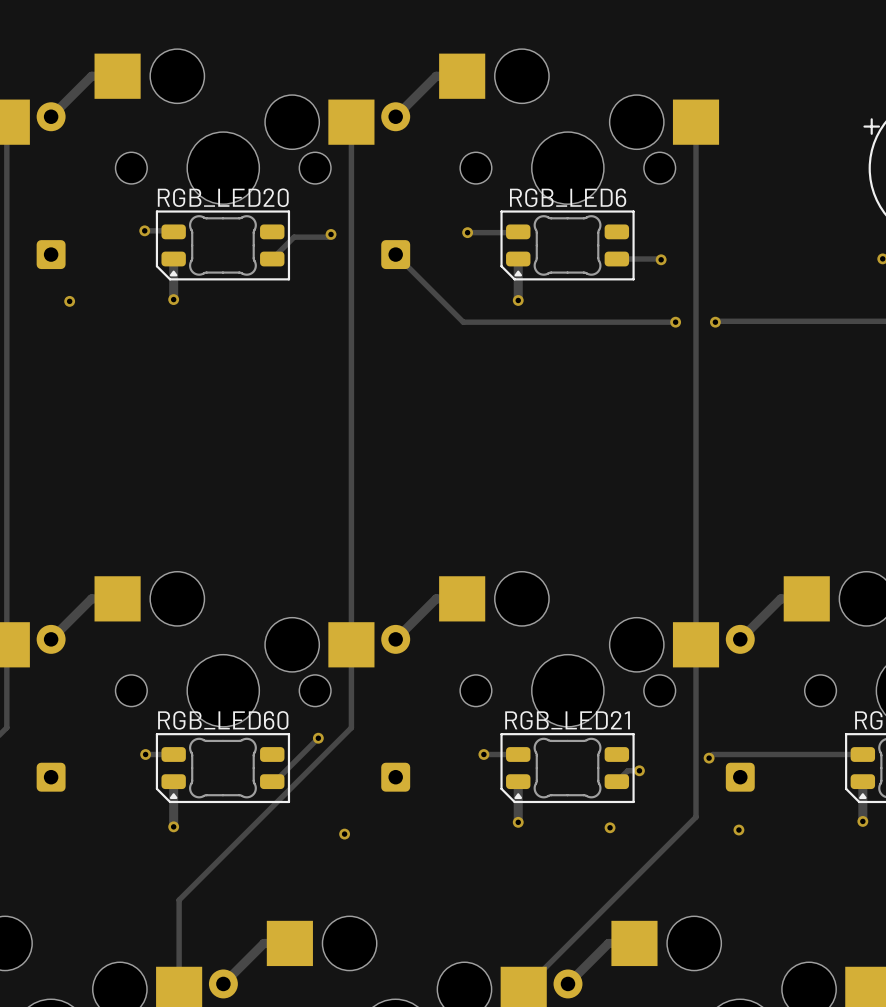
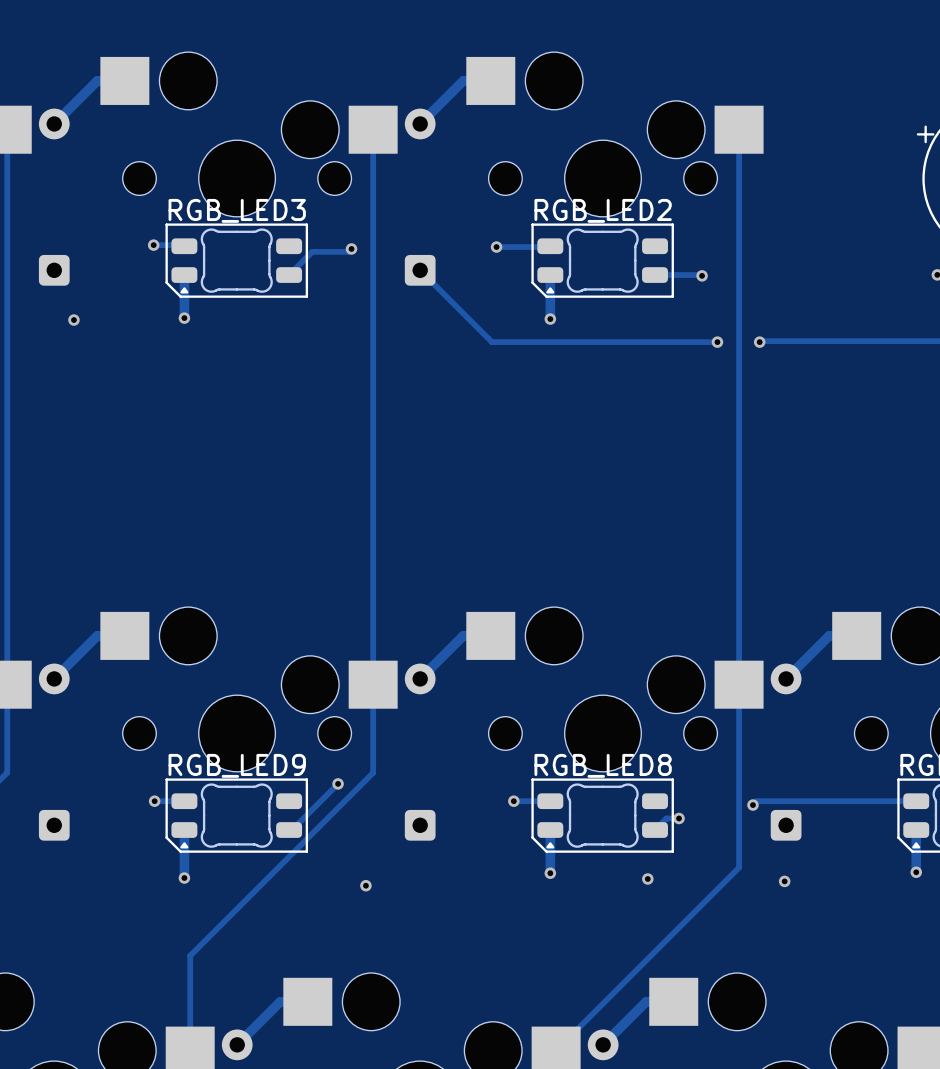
RGB_LED20 name: RGB_LED20 (223, 197) -> RGB_LED3 (237, 210)
RGB_LED6 name: RGB_LED6 (568, 197) -> RGB_LED2 (603, 210)
RGB_LED60 name: RGB_LED60 (223, 720) -> RGB_LED9 (237, 765)
RGB_LED21 name: RGB_LED21 (567, 720) -> RGB_LED8 (603, 765)

